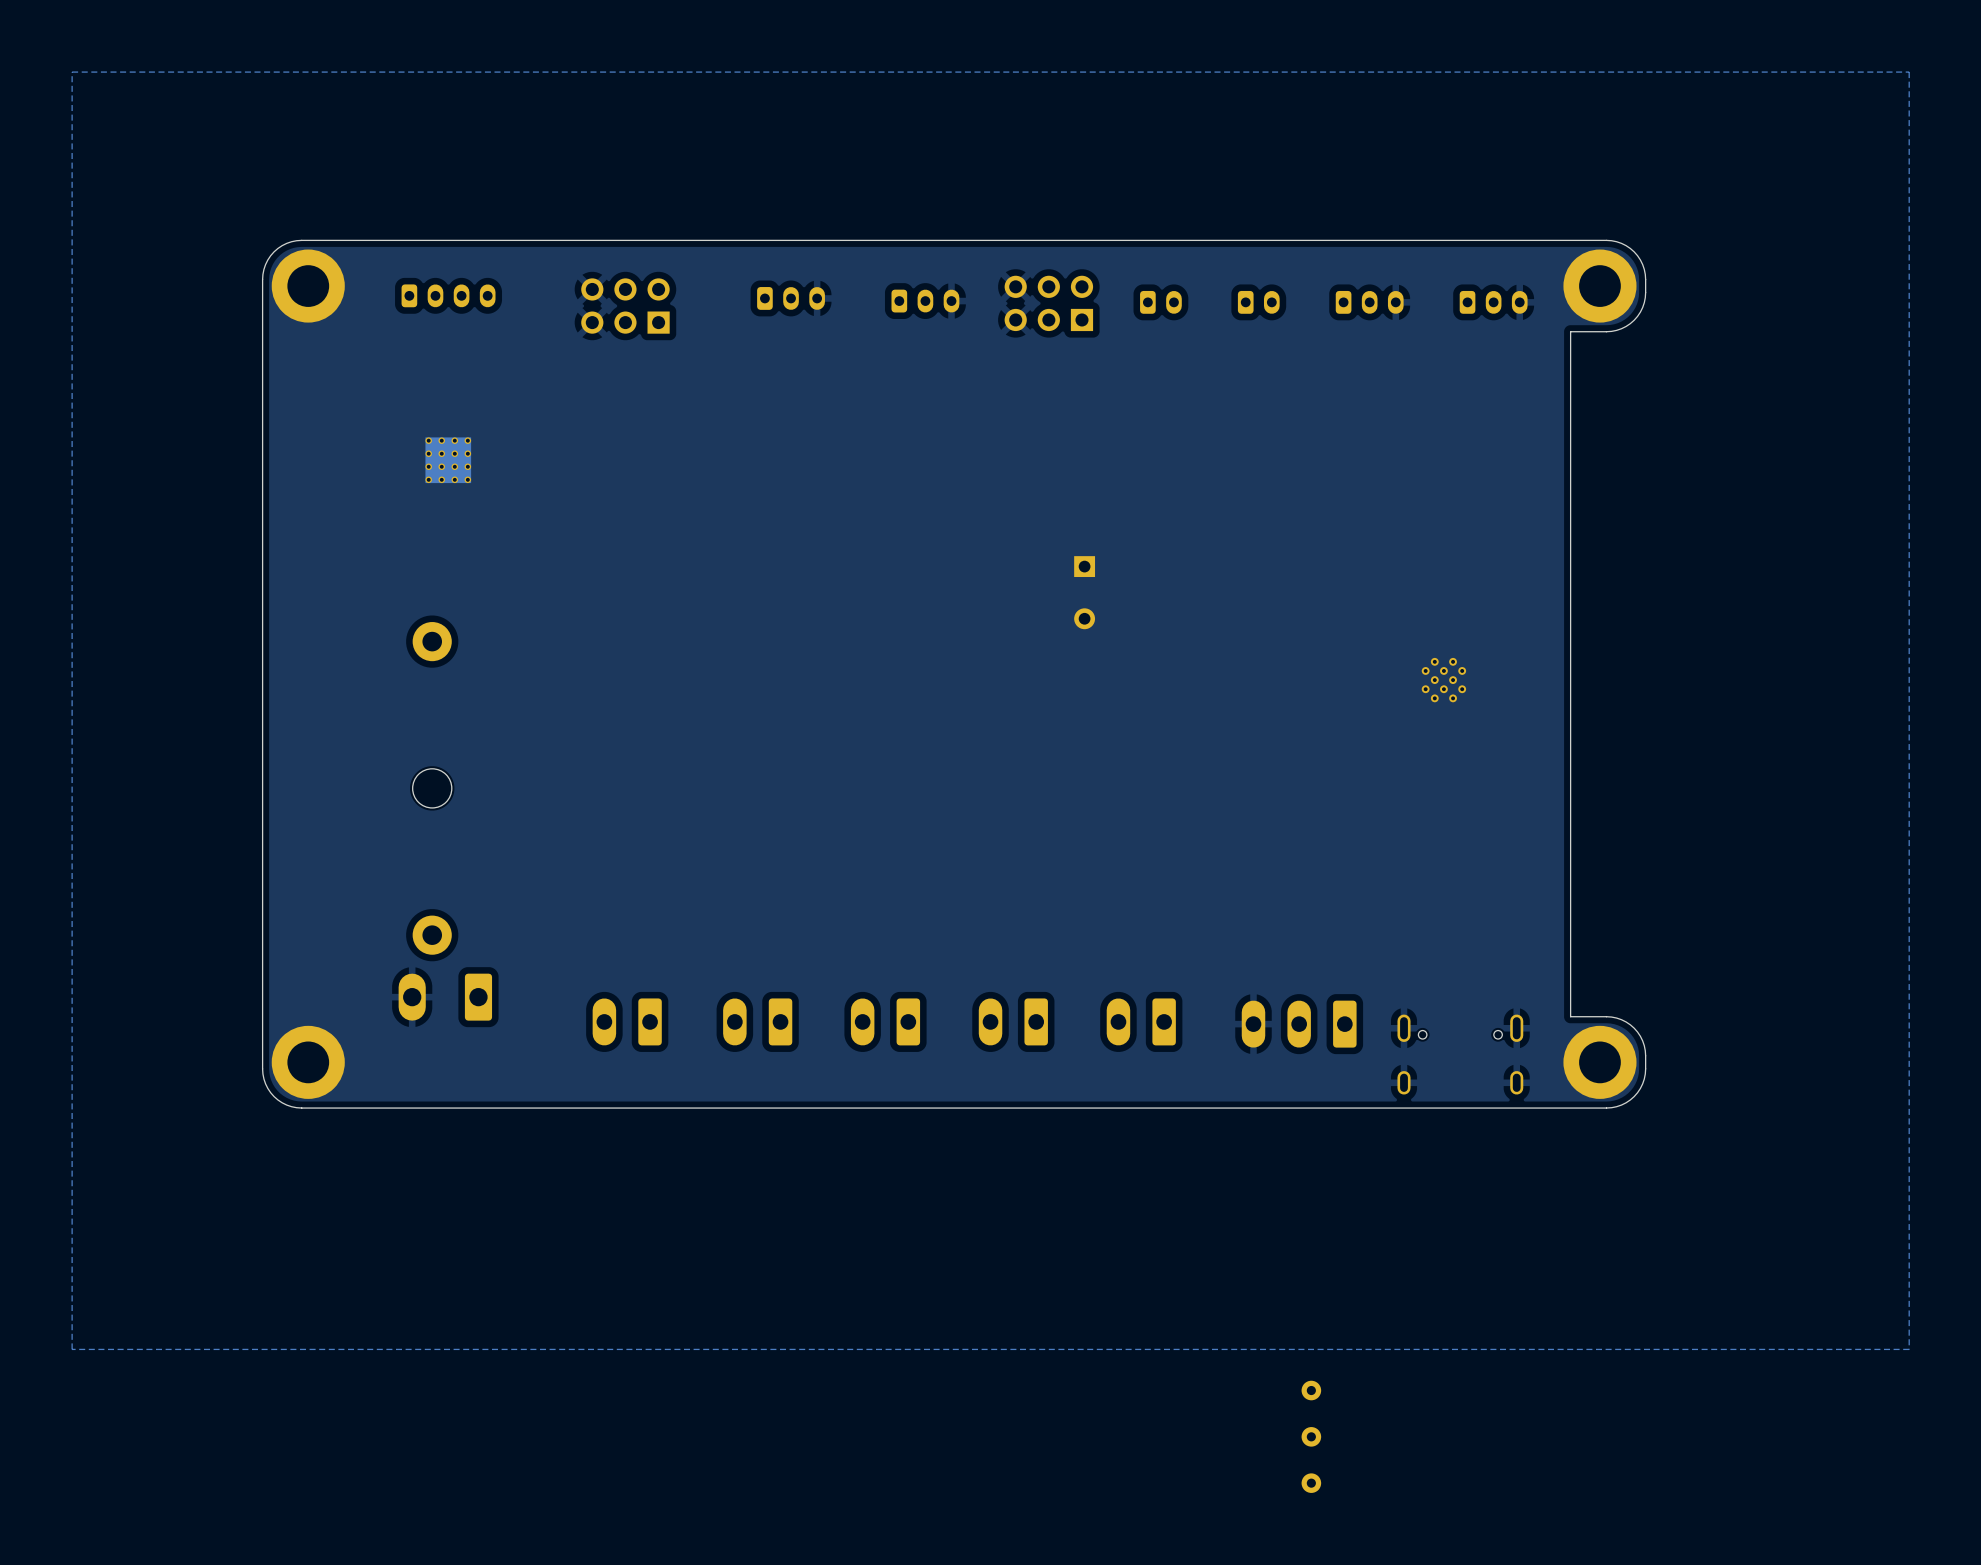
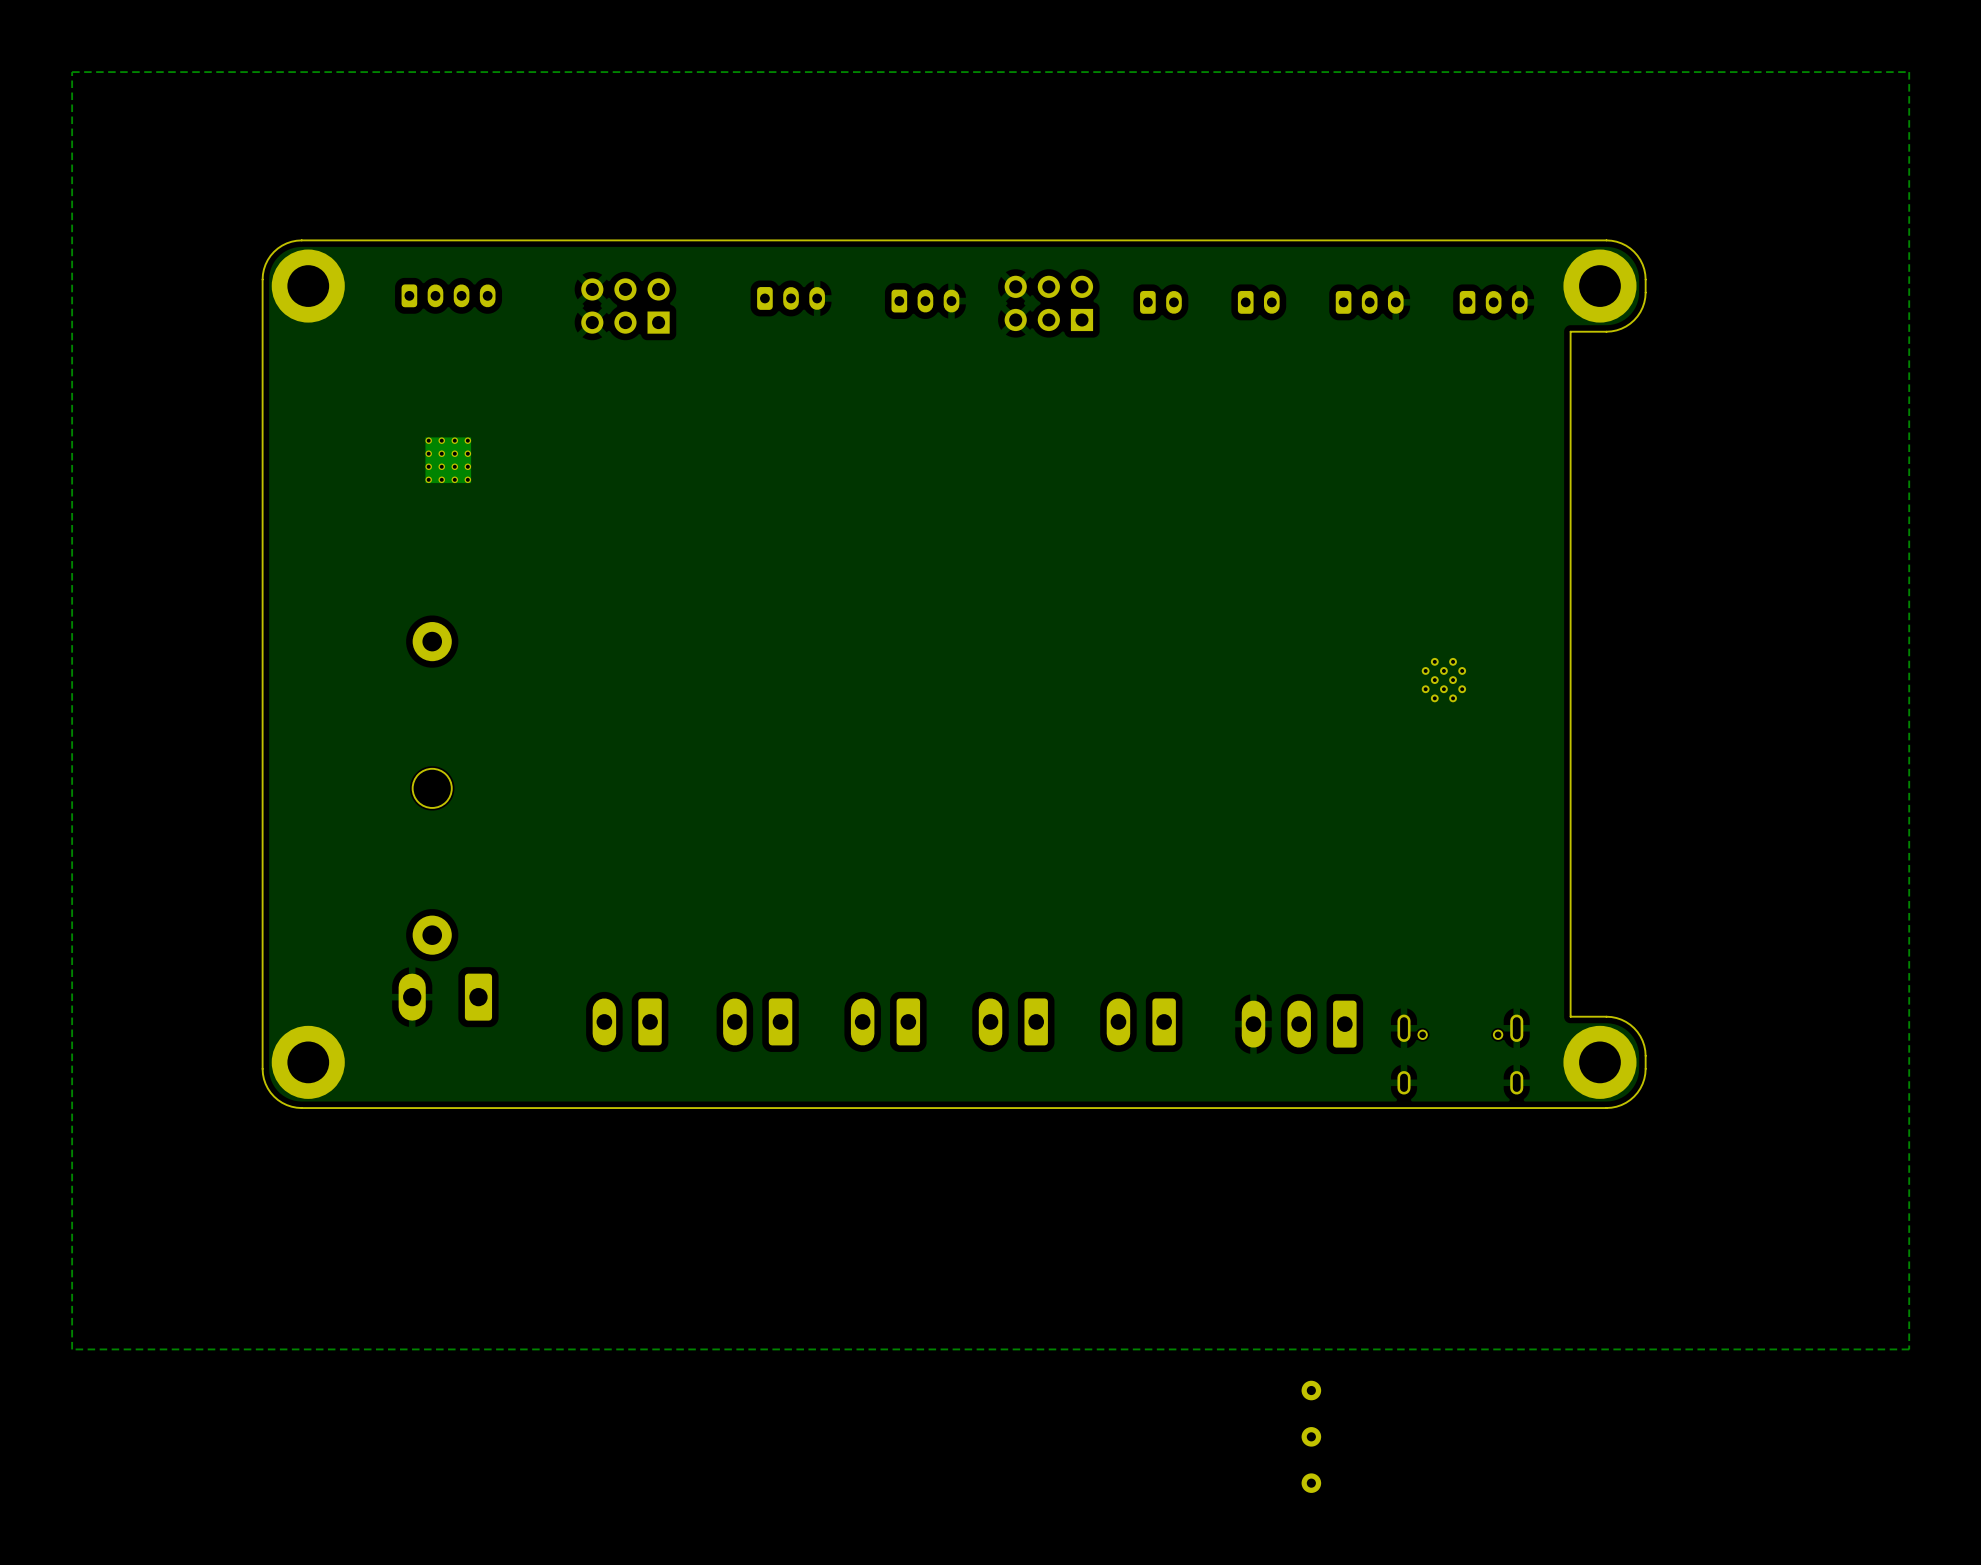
part: (1084, 592) -> none

